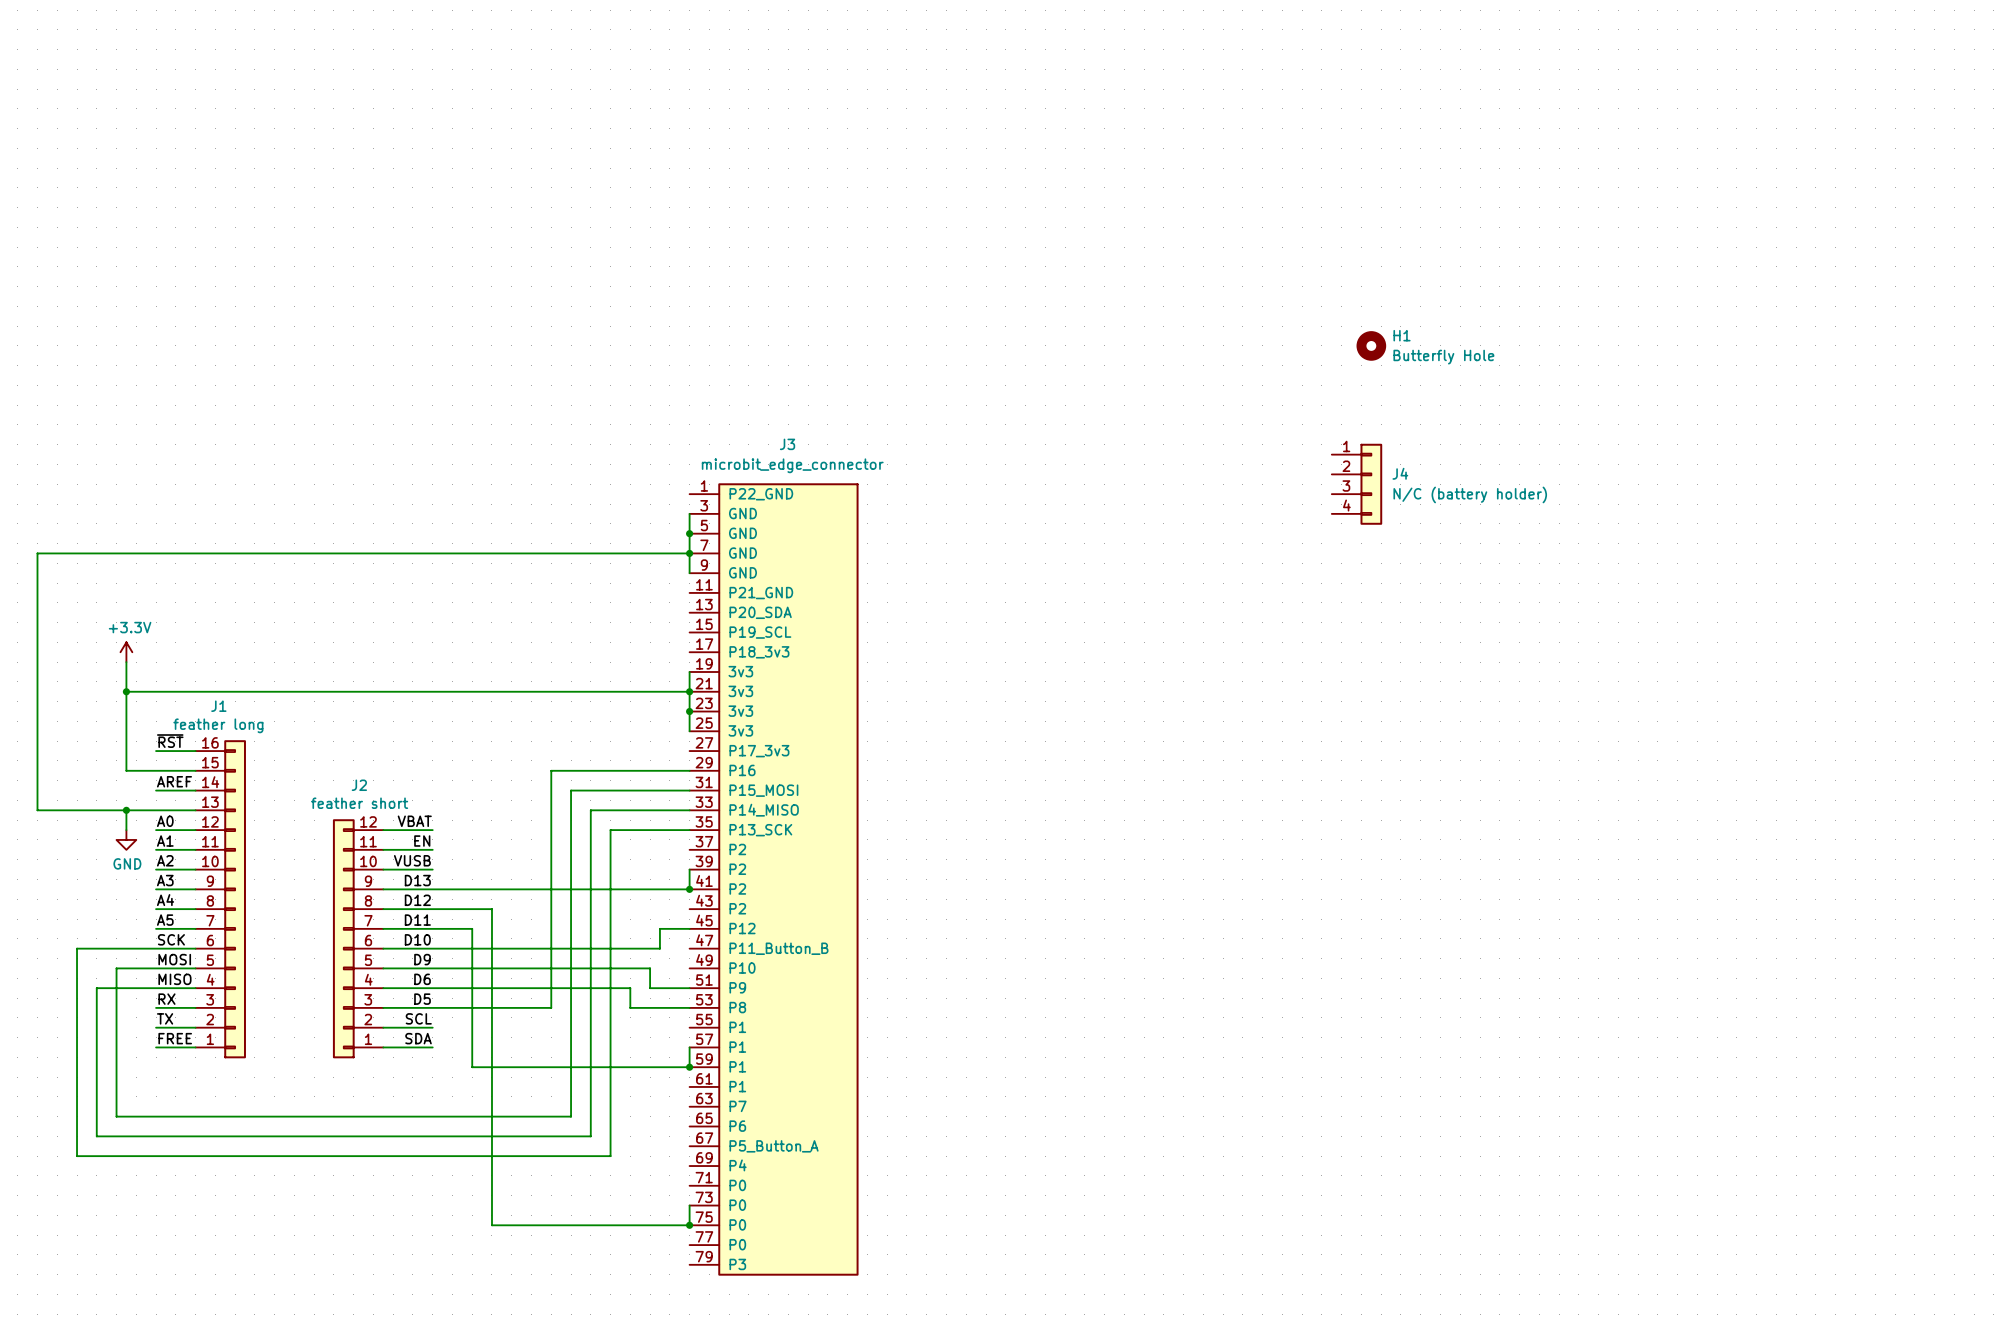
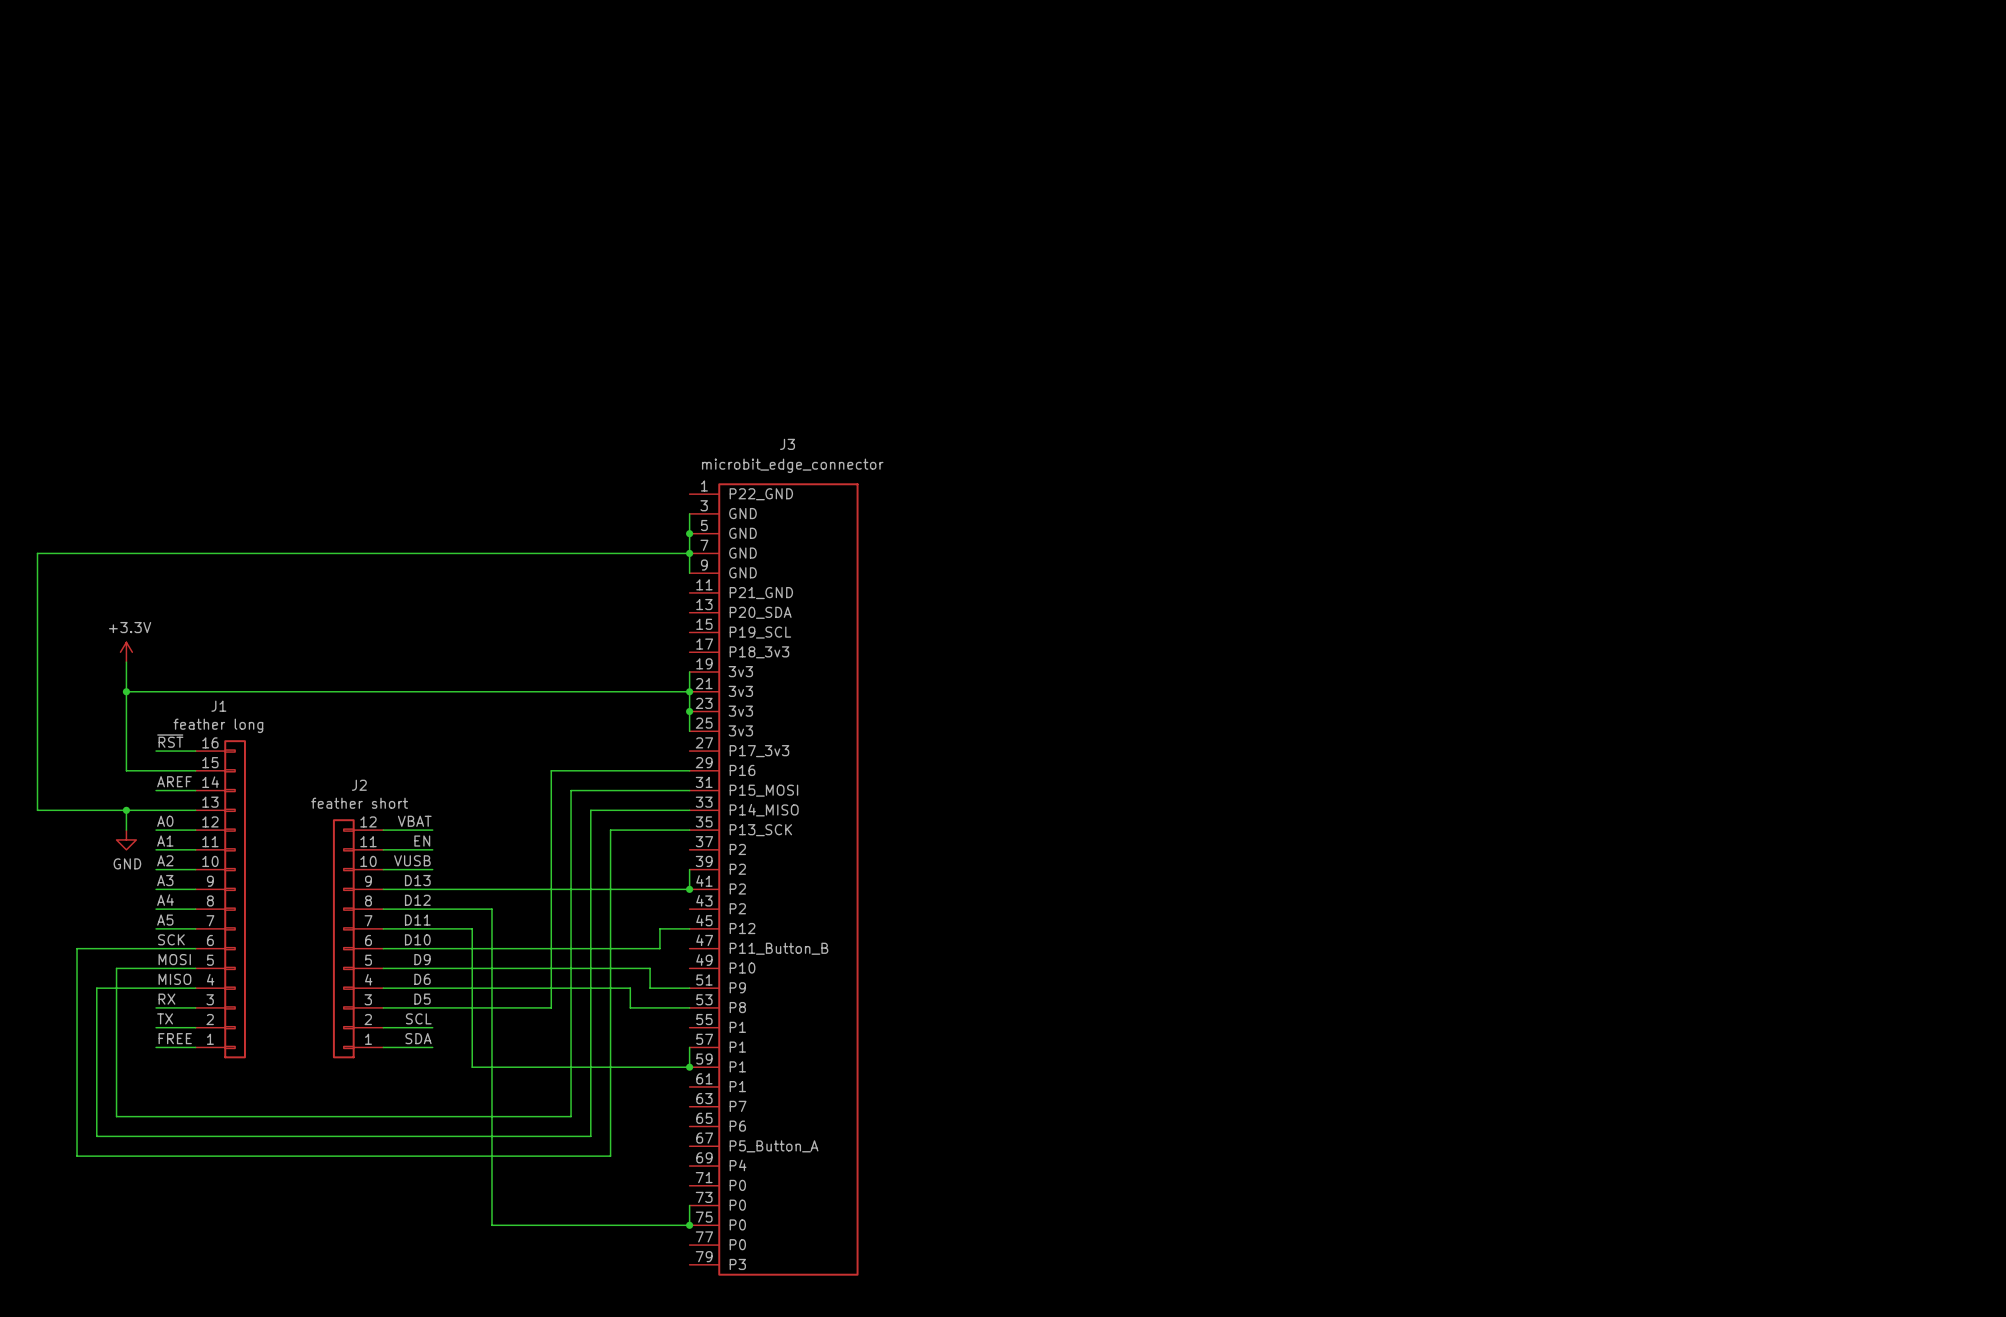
H1: Butterfly Hole (1371, 345) -> none
J4: N/C (battery holder) (1357, 484) -> none

